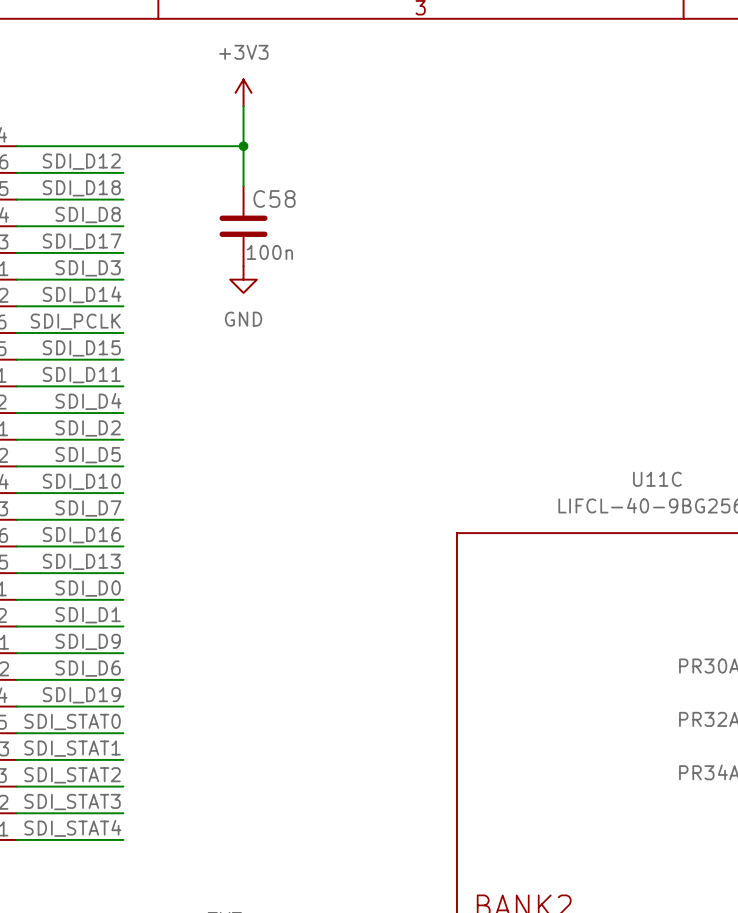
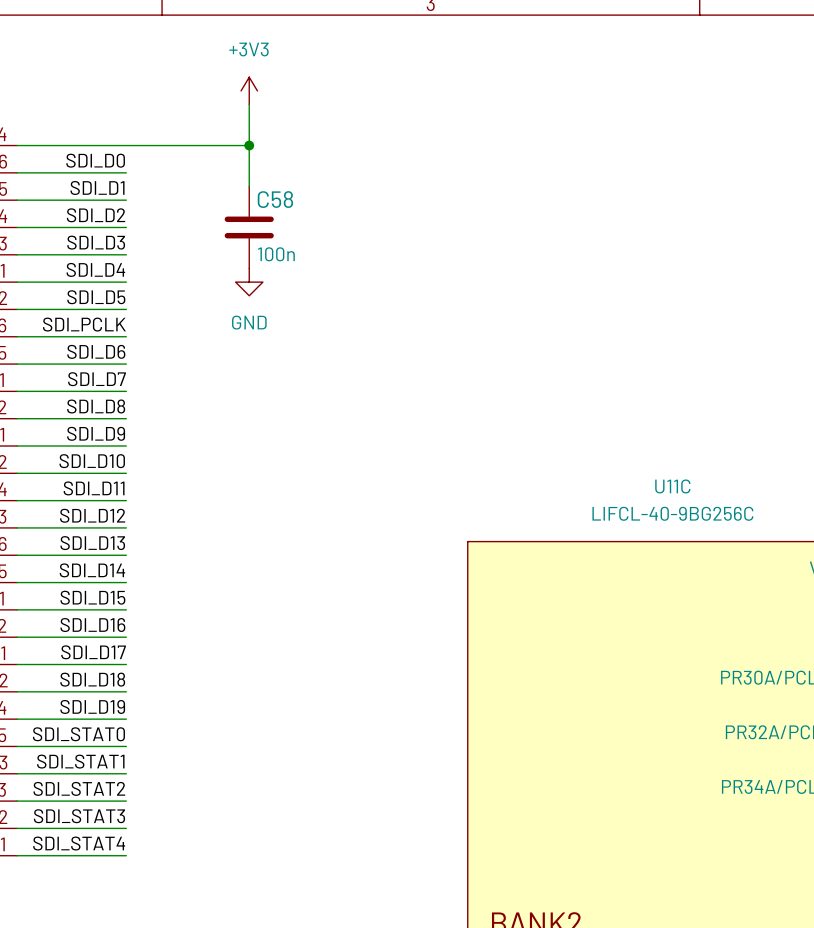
label: SDI_D12 (81, 161) -> SDI_D0 (95, 160)
label: SDI_D18 (81, 188) -> SDI_D1 (97, 187)
label: SDI_D8 (88, 215) -> SDI_D2 (96, 215)
label: SDI_D17 (82, 241) -> SDI_D3 (96, 242)
label: SDI_D3 (88, 268) -> SDI_D4 (95, 269)
label: SDI_D14 (82, 294) -> SDI_D5 (96, 297)
label: SDI_D15 (81, 348) -> SDI_D6 (96, 351)
label: SDI_D11 (81, 375) -> SDI_D7 (97, 379)
label: SDI_D4 (88, 401) -> SDI_D8 (96, 406)
label: SDI_D2 (88, 428) -> SDI_D9 (96, 433)
label: SDI_D5 (88, 455) -> SDI_D10 (92, 461)
label: SDI_D10 (81, 481) -> SDI_D11 (94, 488)
label: SDI_D7 (88, 508) -> SDI_D12 (92, 515)
label: SDI_D16 (81, 535) -> SDI_D13 (92, 543)
label: SDI_D13 (81, 561) -> SDI_D14 (92, 570)
label: SDI_D0 (88, 588) -> SDI_D15 (92, 597)
label: SDI_D1 (88, 615) -> SDI_D16 (92, 625)
label: SDI_D9 (88, 641) -> SDI_D17 (93, 652)
label: SDI_D6 (88, 668) -> SDI_D18 (92, 679)

